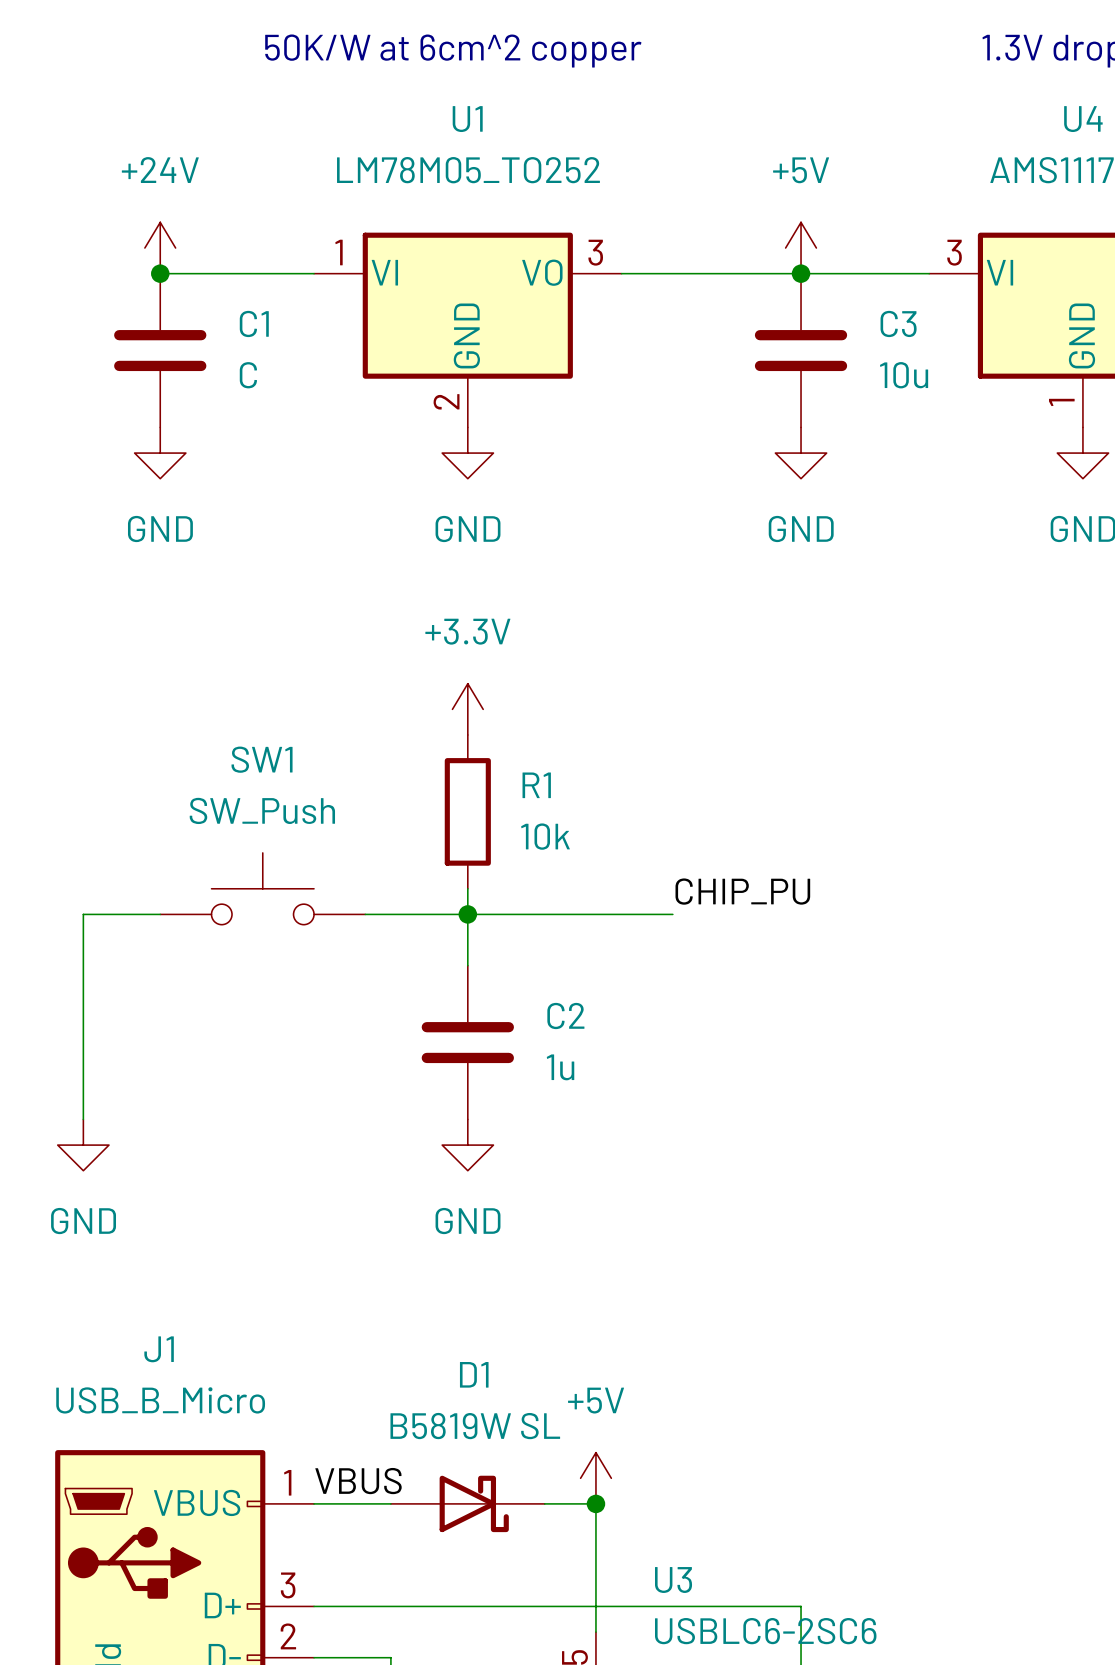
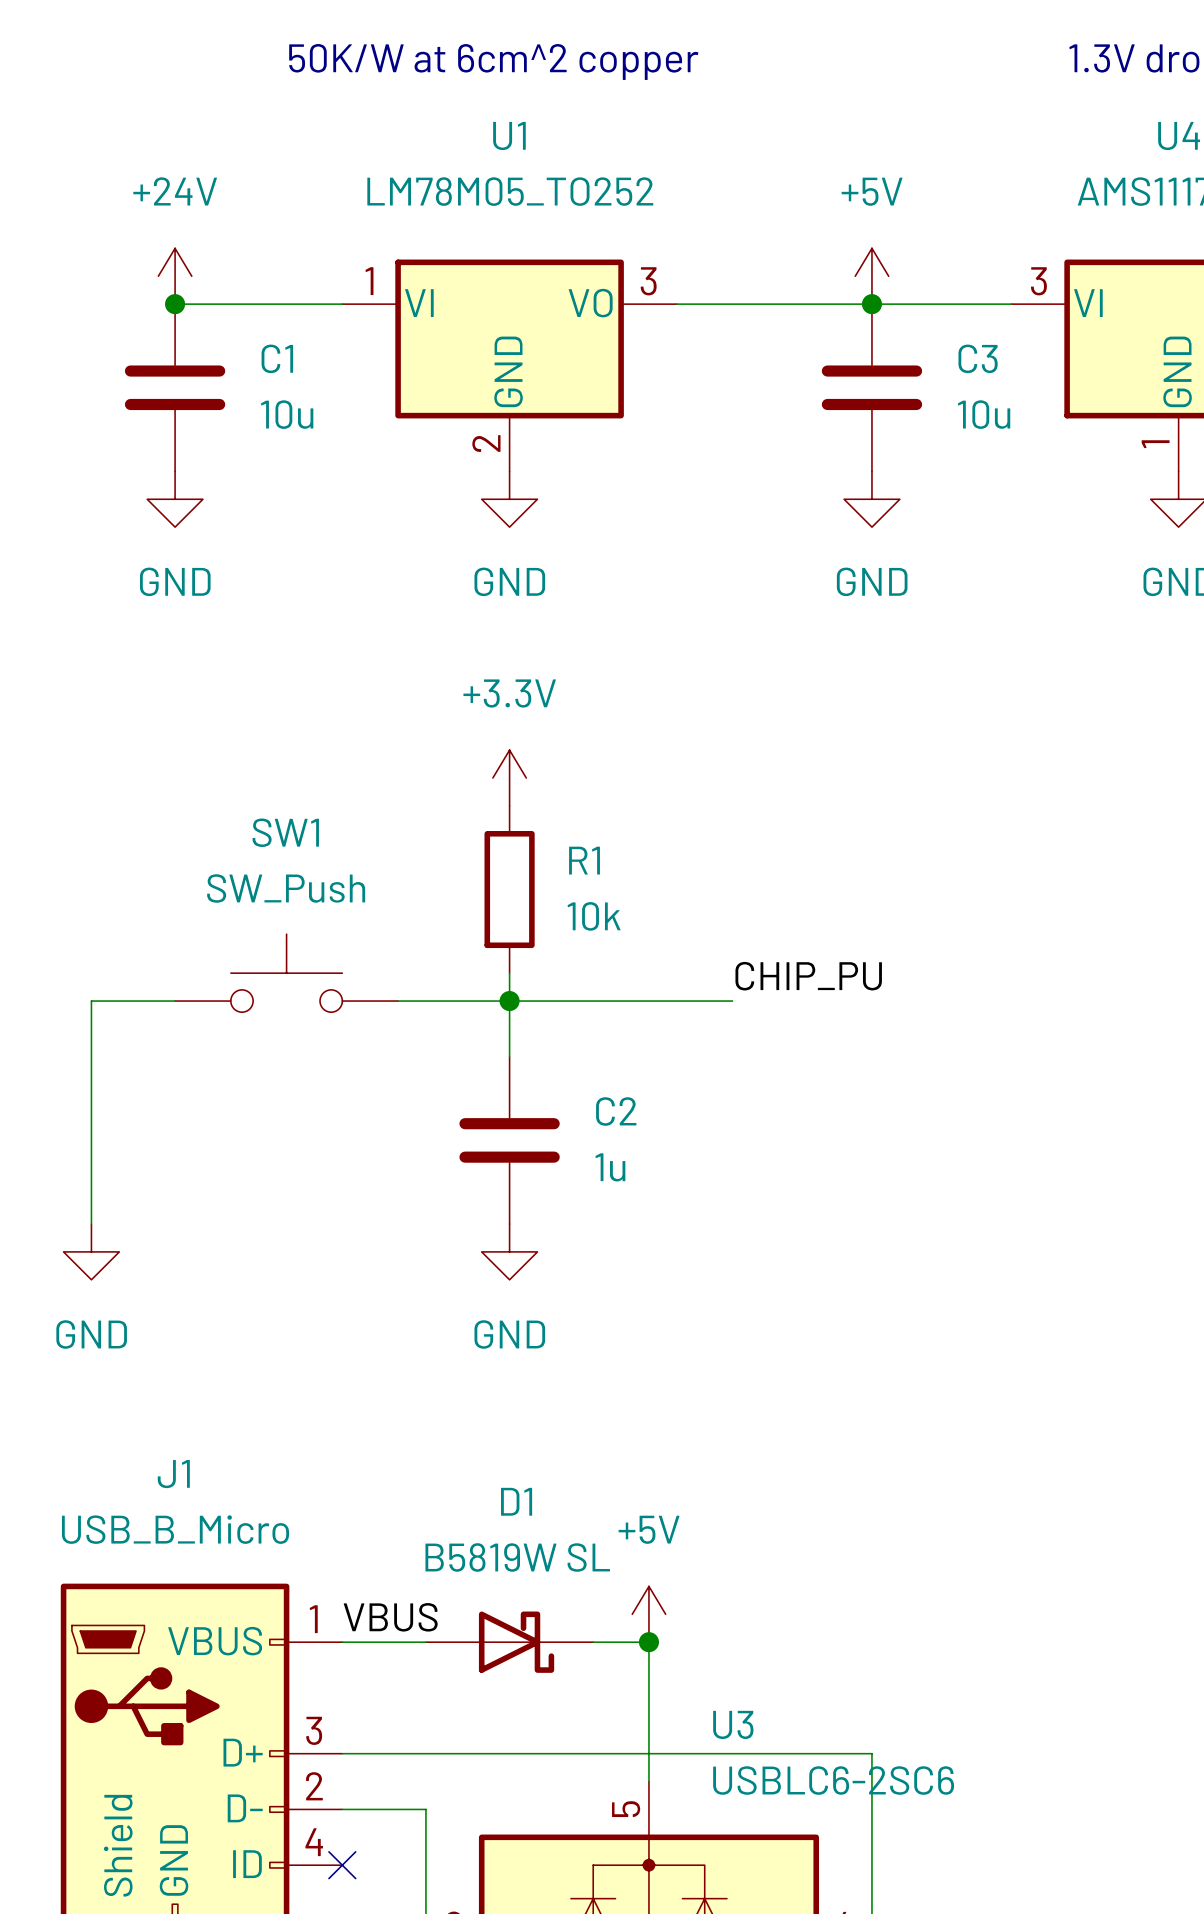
C1 value: C (248, 375) -> 10u (287, 414)

